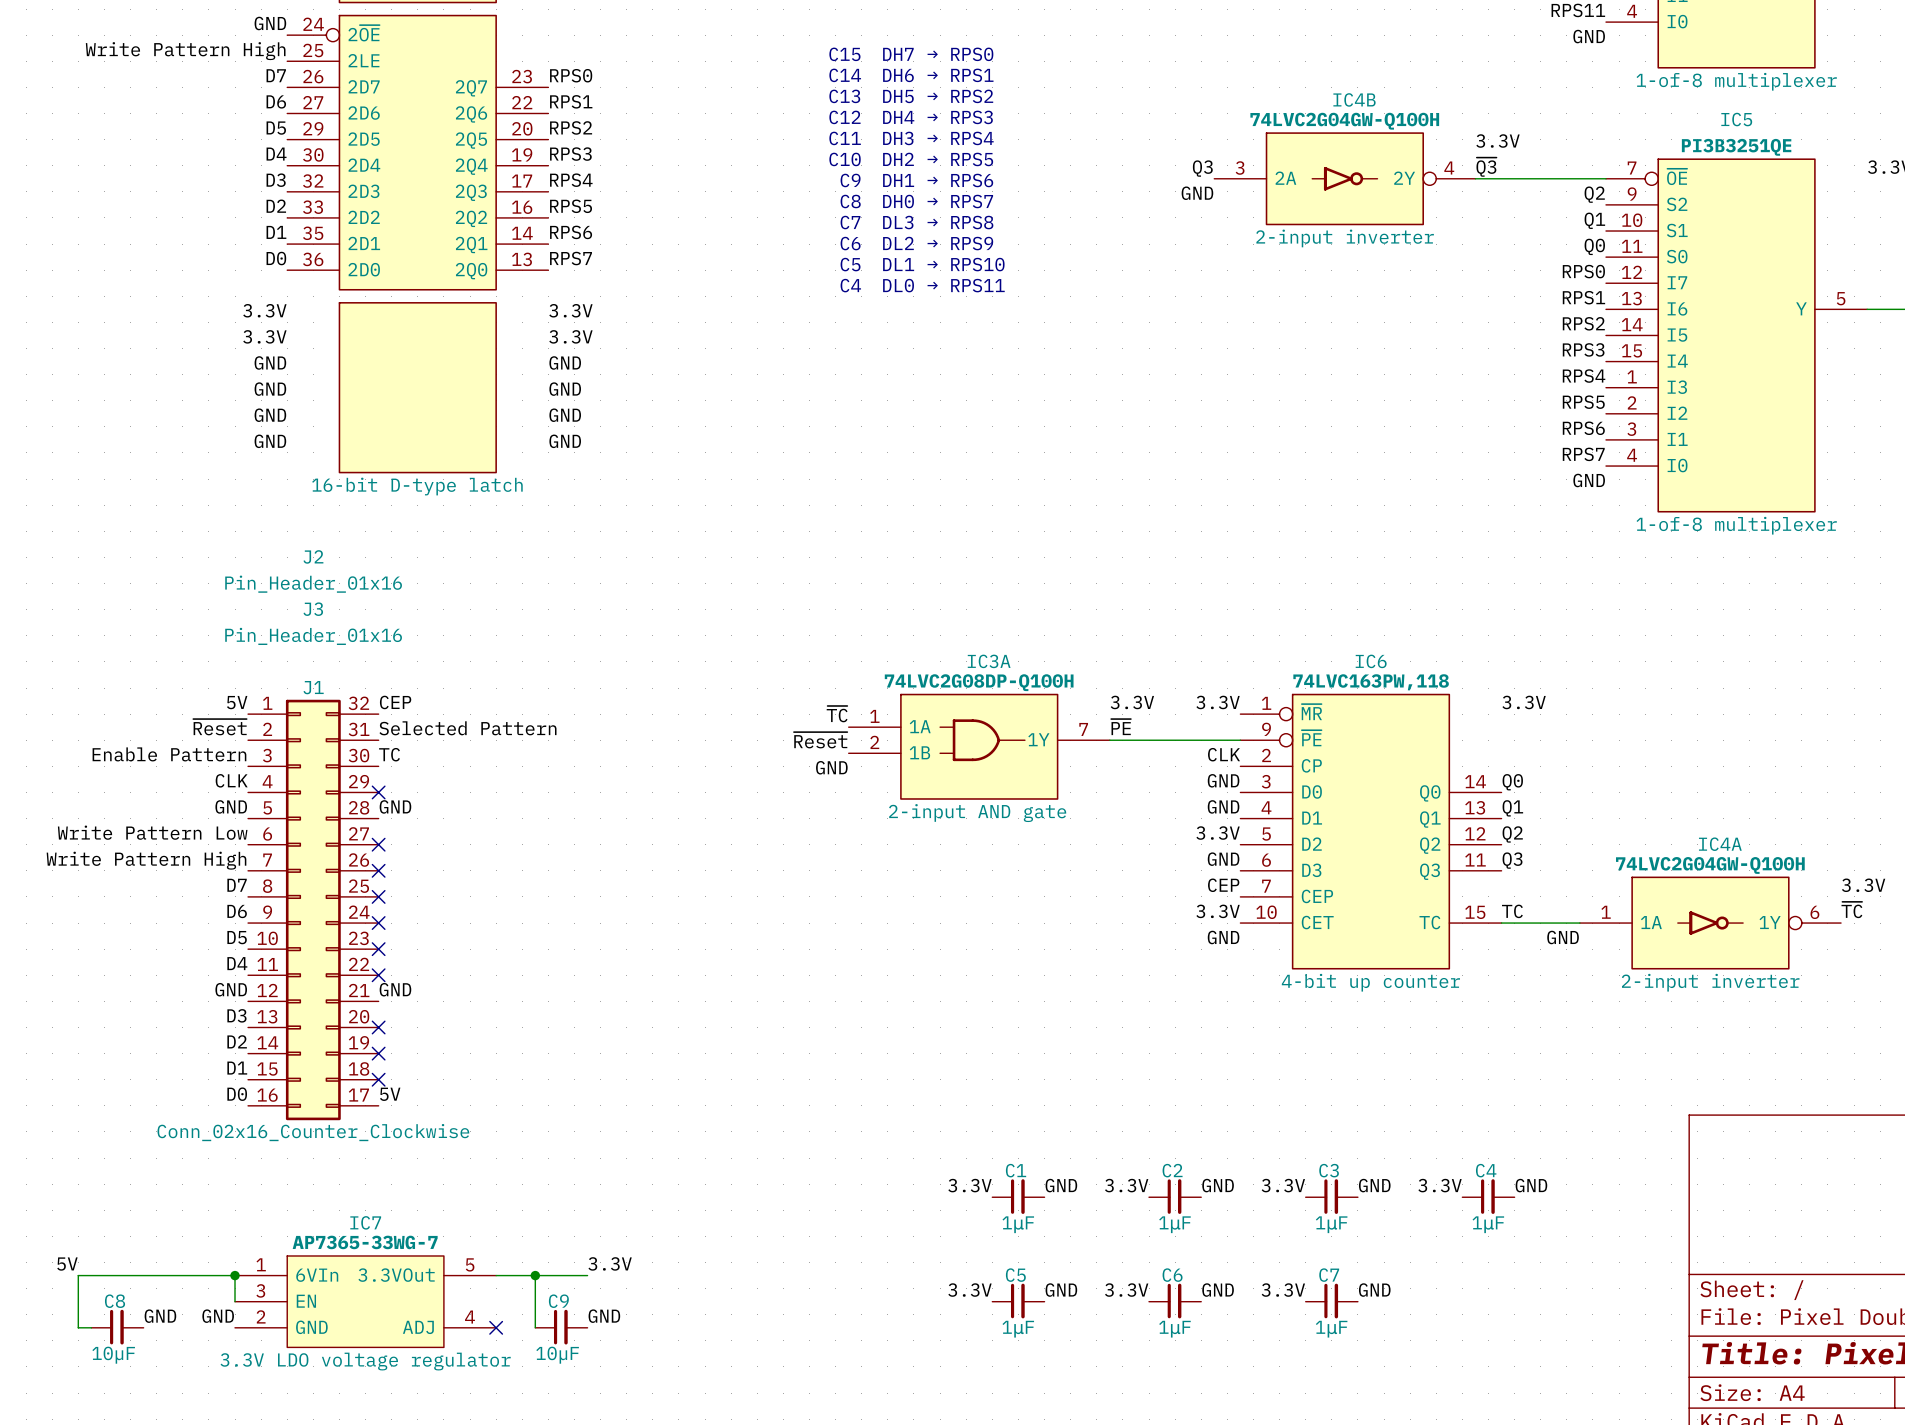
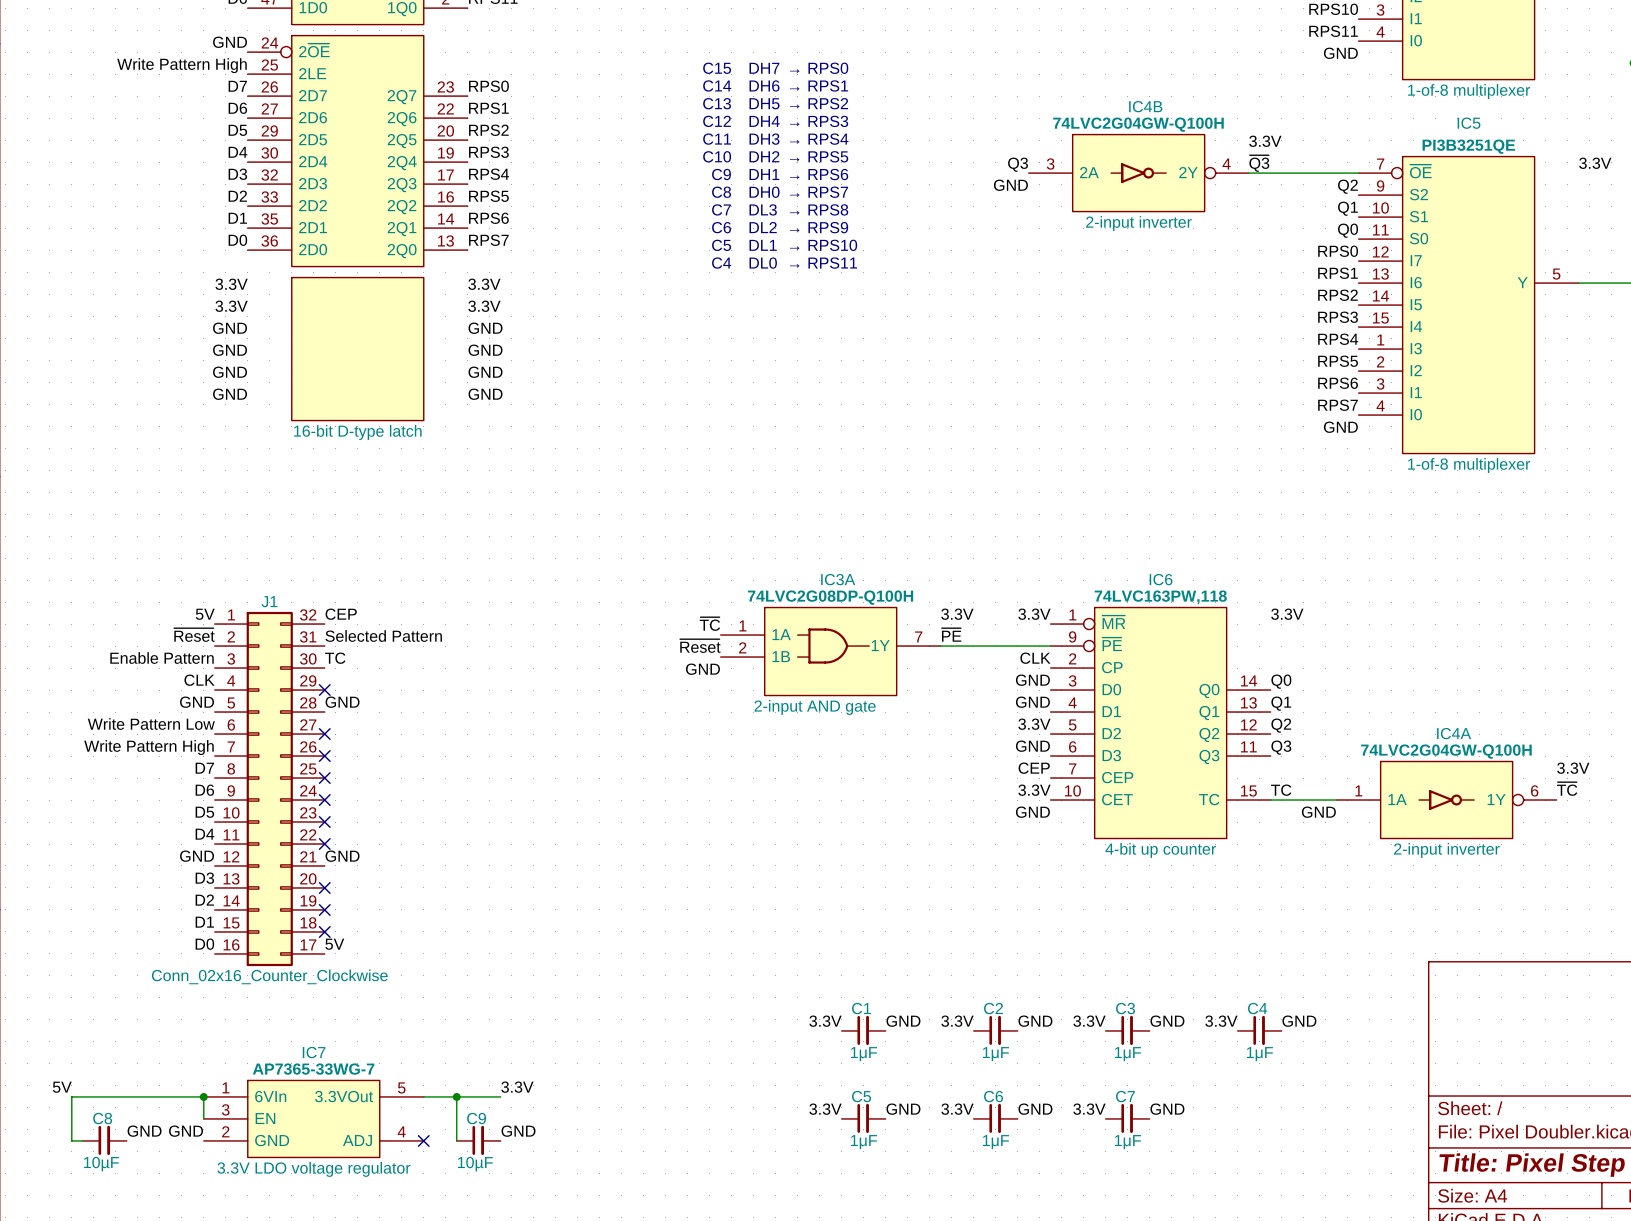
J2: Pin_Header_01x16 (313, 571) -> none
J3: Pin_Header_01x16 (313, 623) -> none

